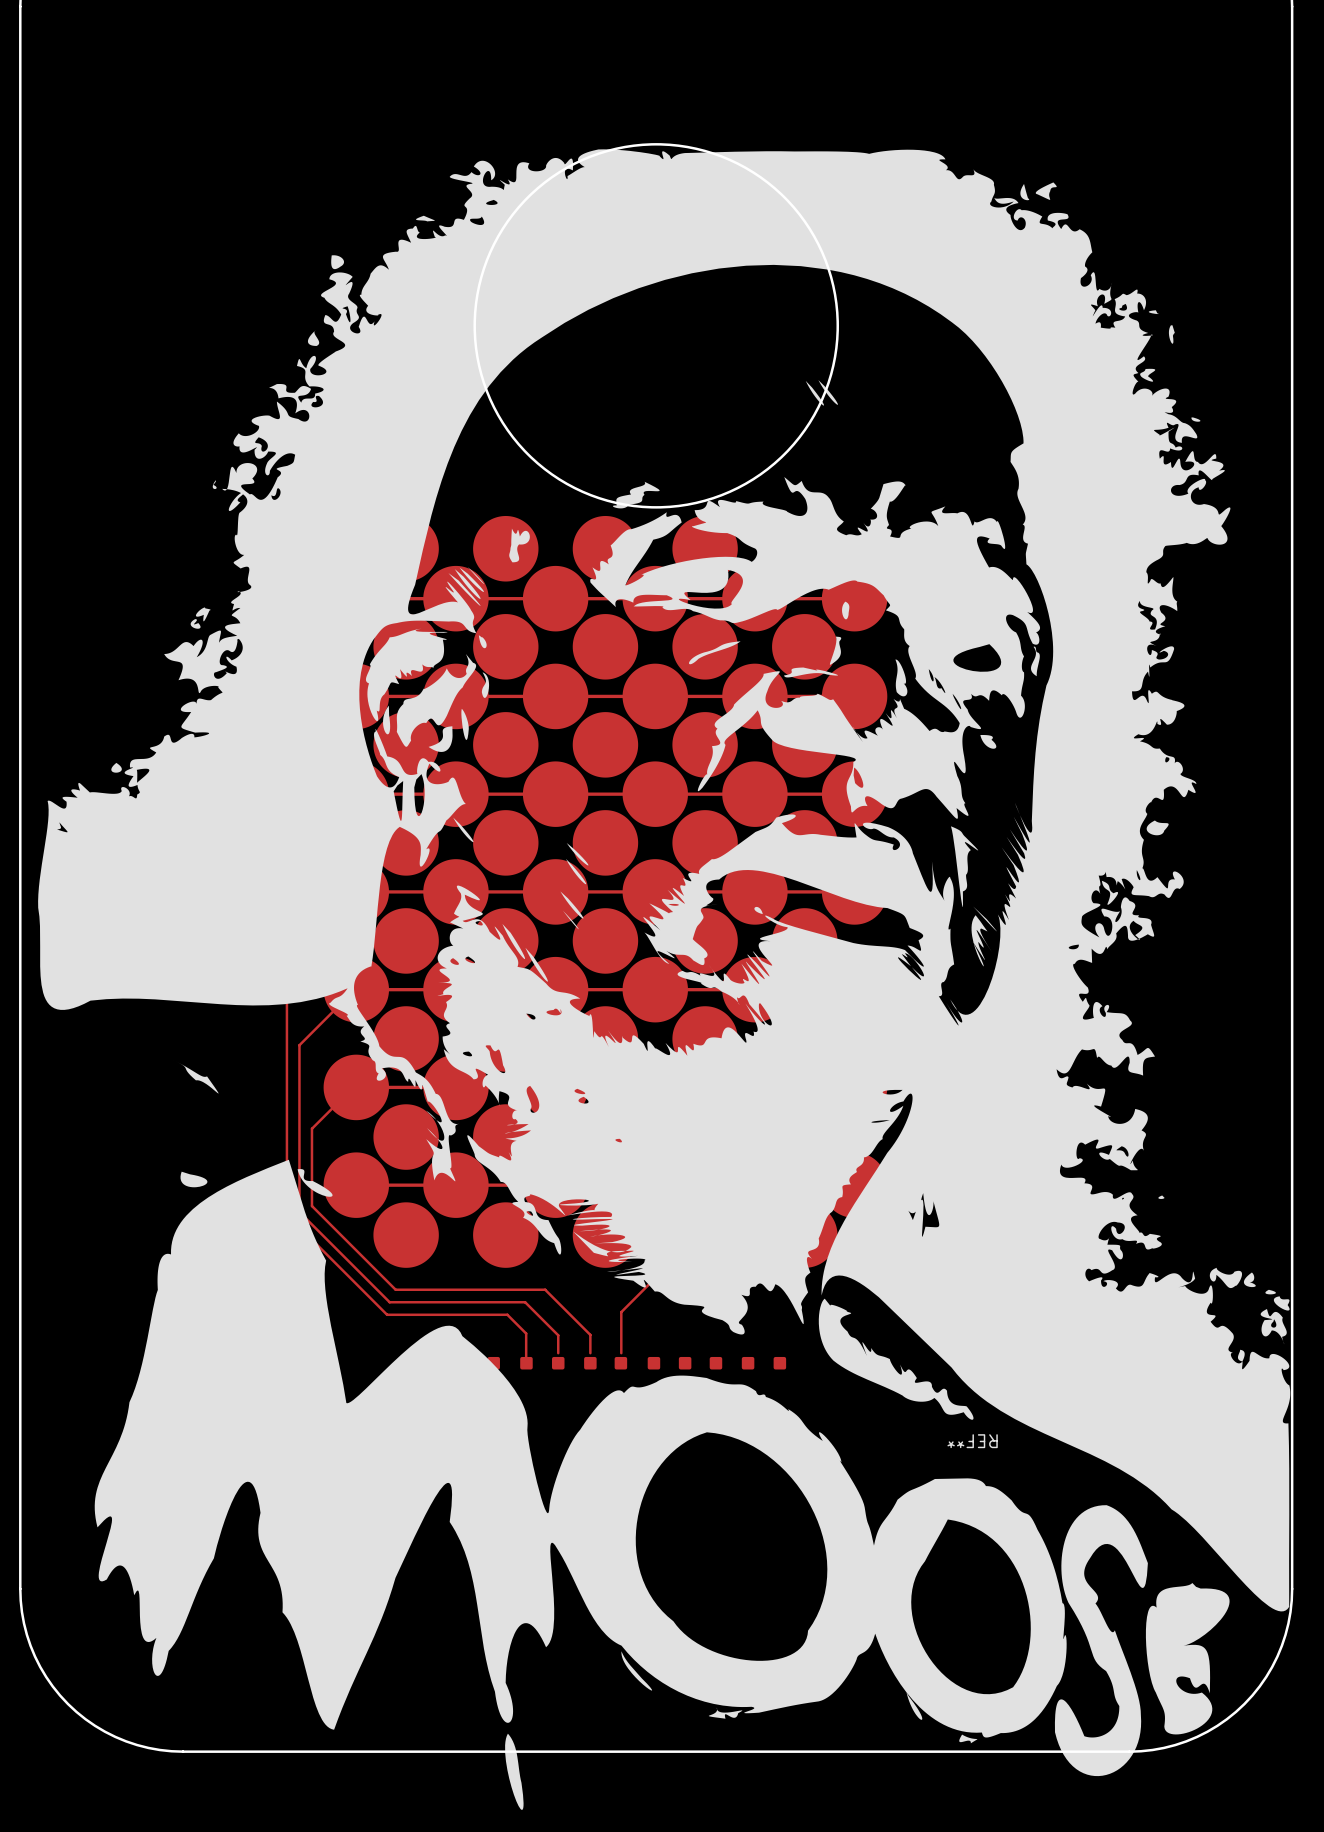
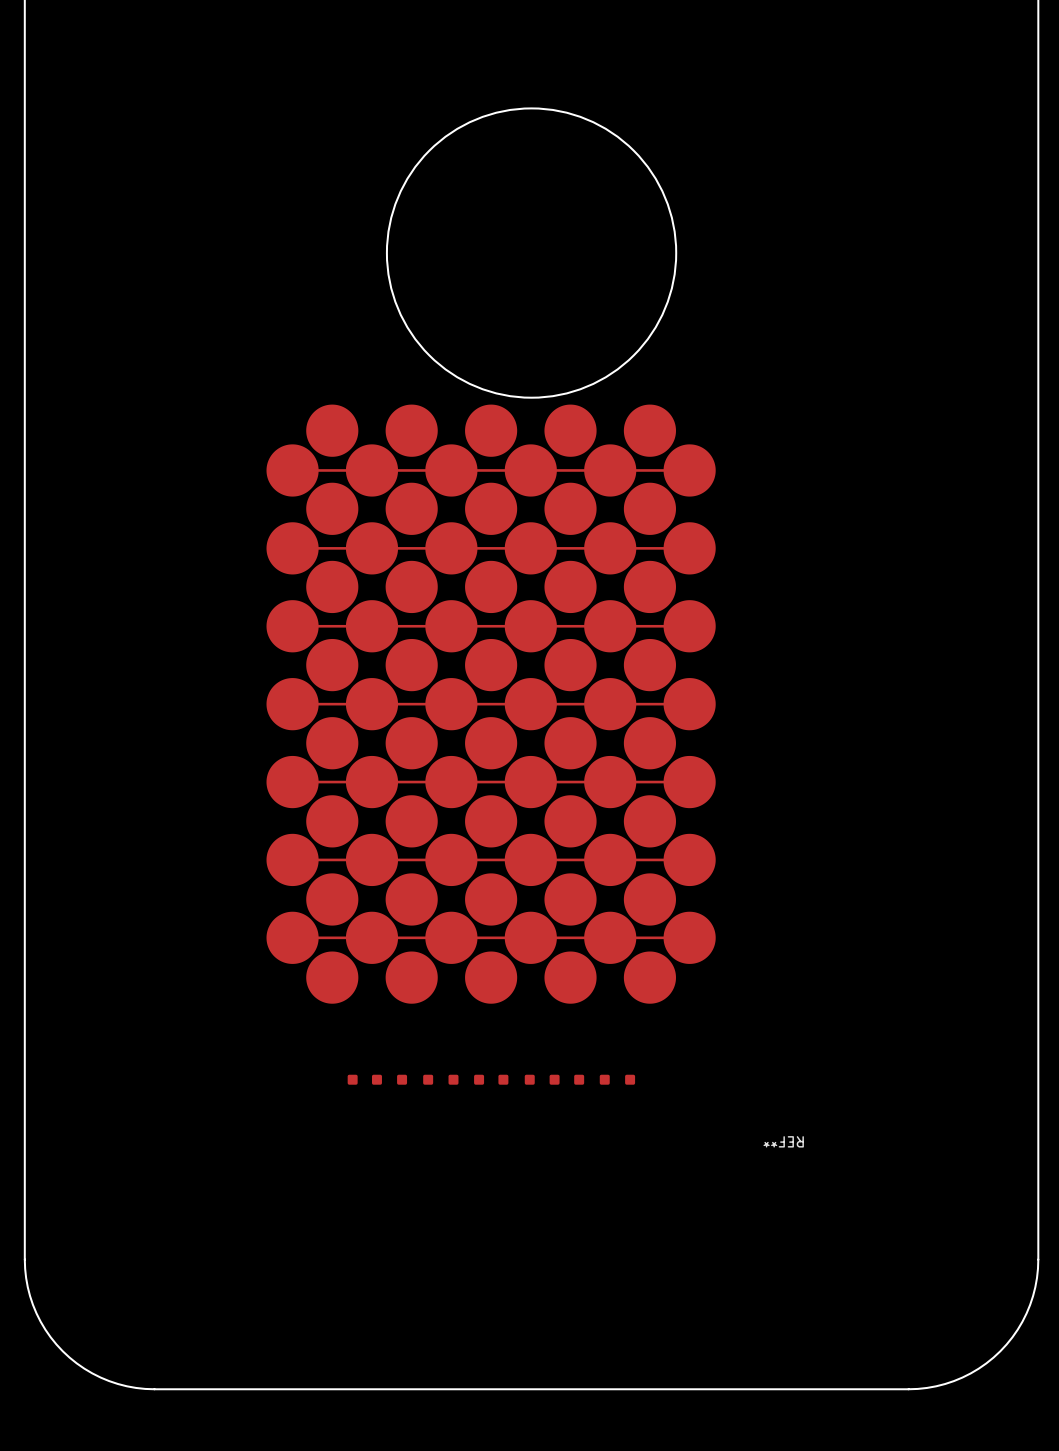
drawing: [38, 149, 1291, 1810] -> none
track: (356, 891) (286, 961) (286, 1214) (387, 1314) (507, 1314) (526, 1333) (526, 1362) -> none
track: (356, 989) (299, 1045) (299, 1212) (389, 1302) (525, 1302) (558, 1335) (558, 1353) -> none
track: (356, 1087) (353, 1087) (311, 1128) (311, 1206) (395, 1289) (545, 1289) (590, 1334) (590, 1353) -> none
track: (655, 1185) (655, 1278) (621, 1312) (621, 1353) -> none

